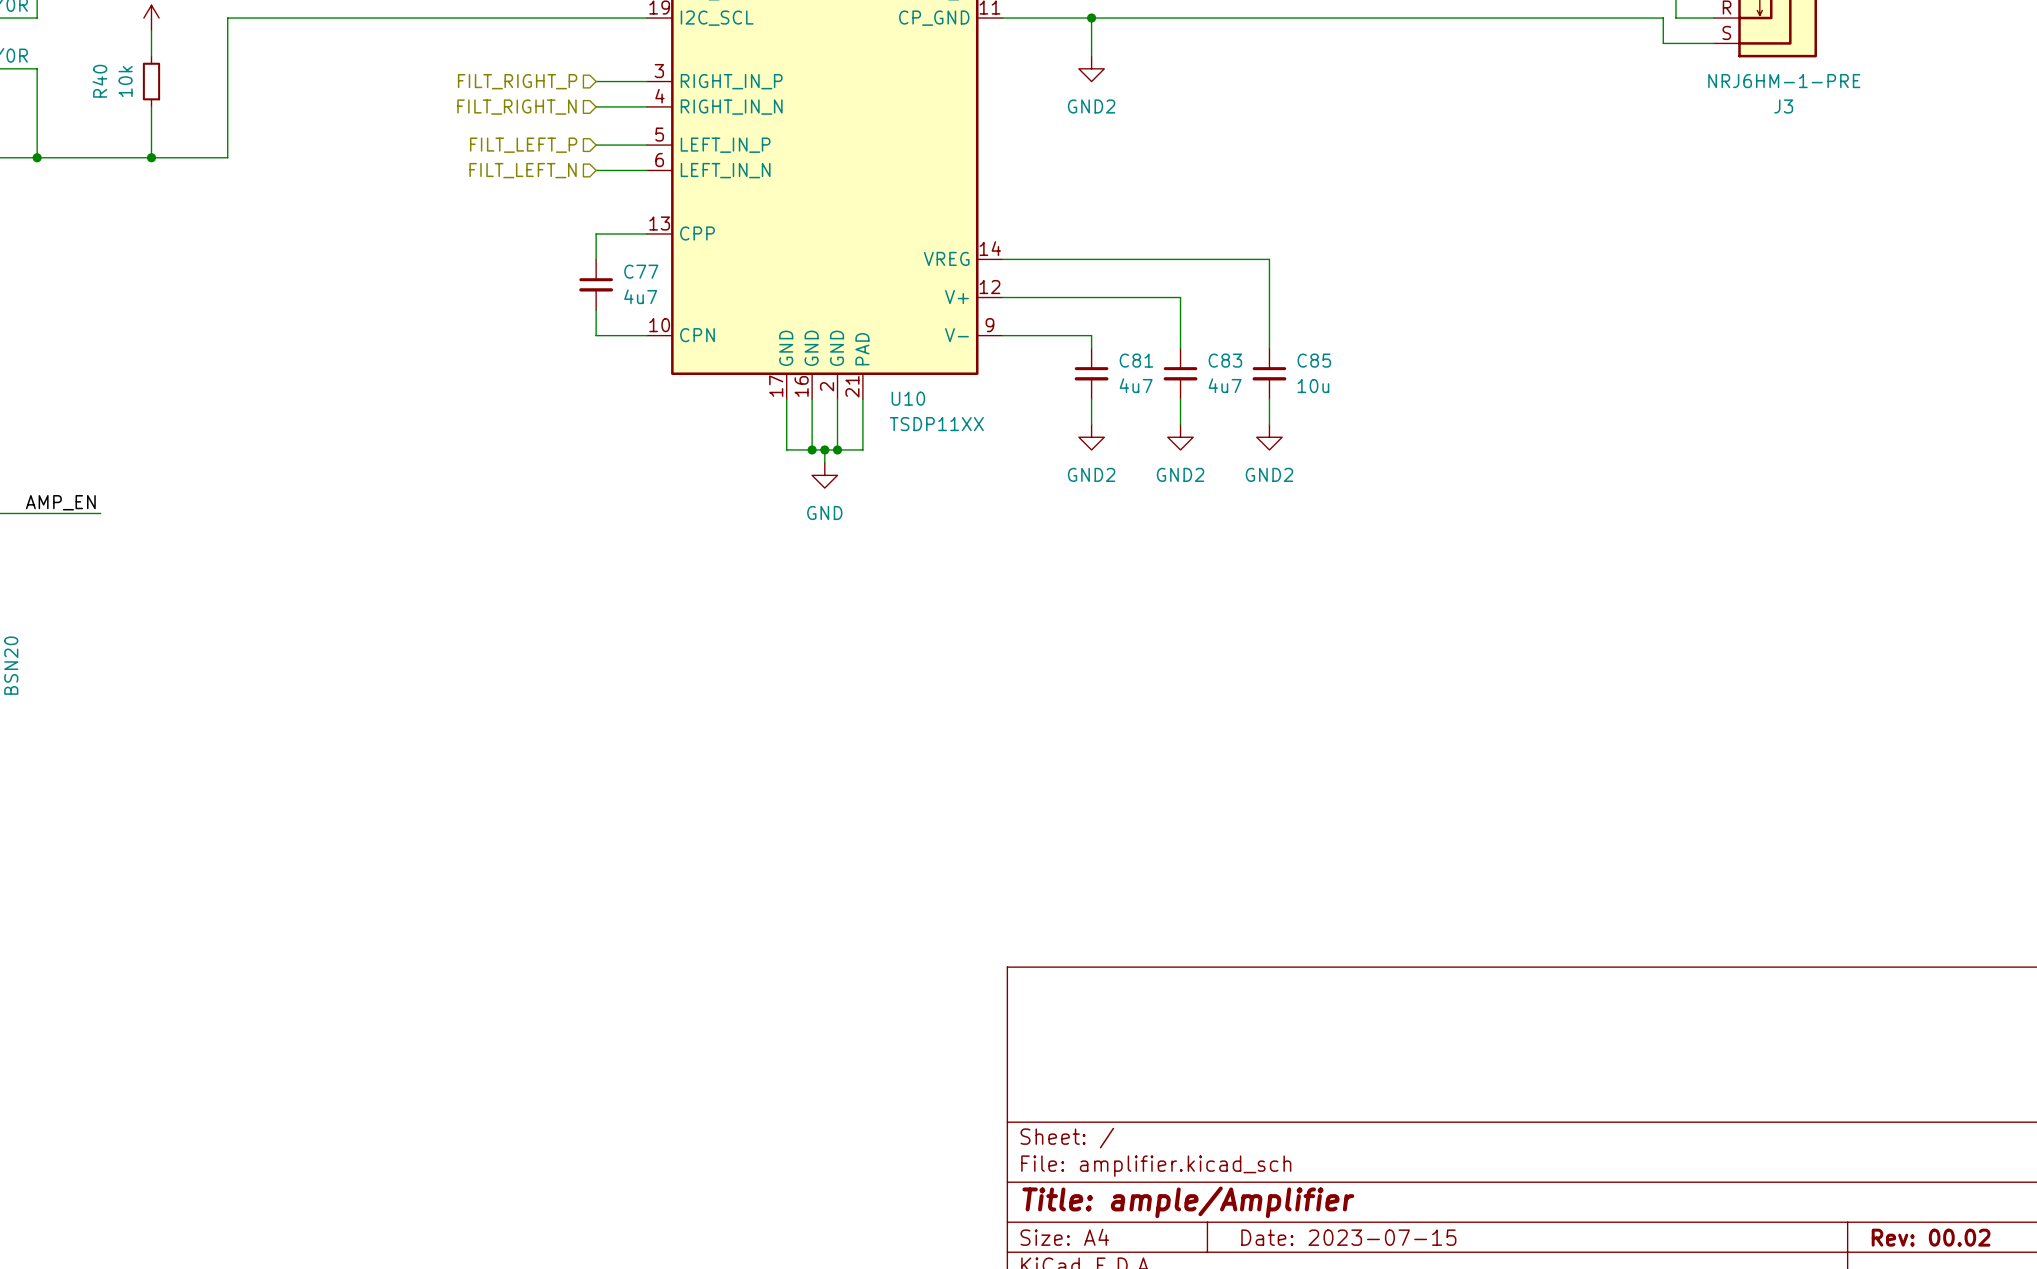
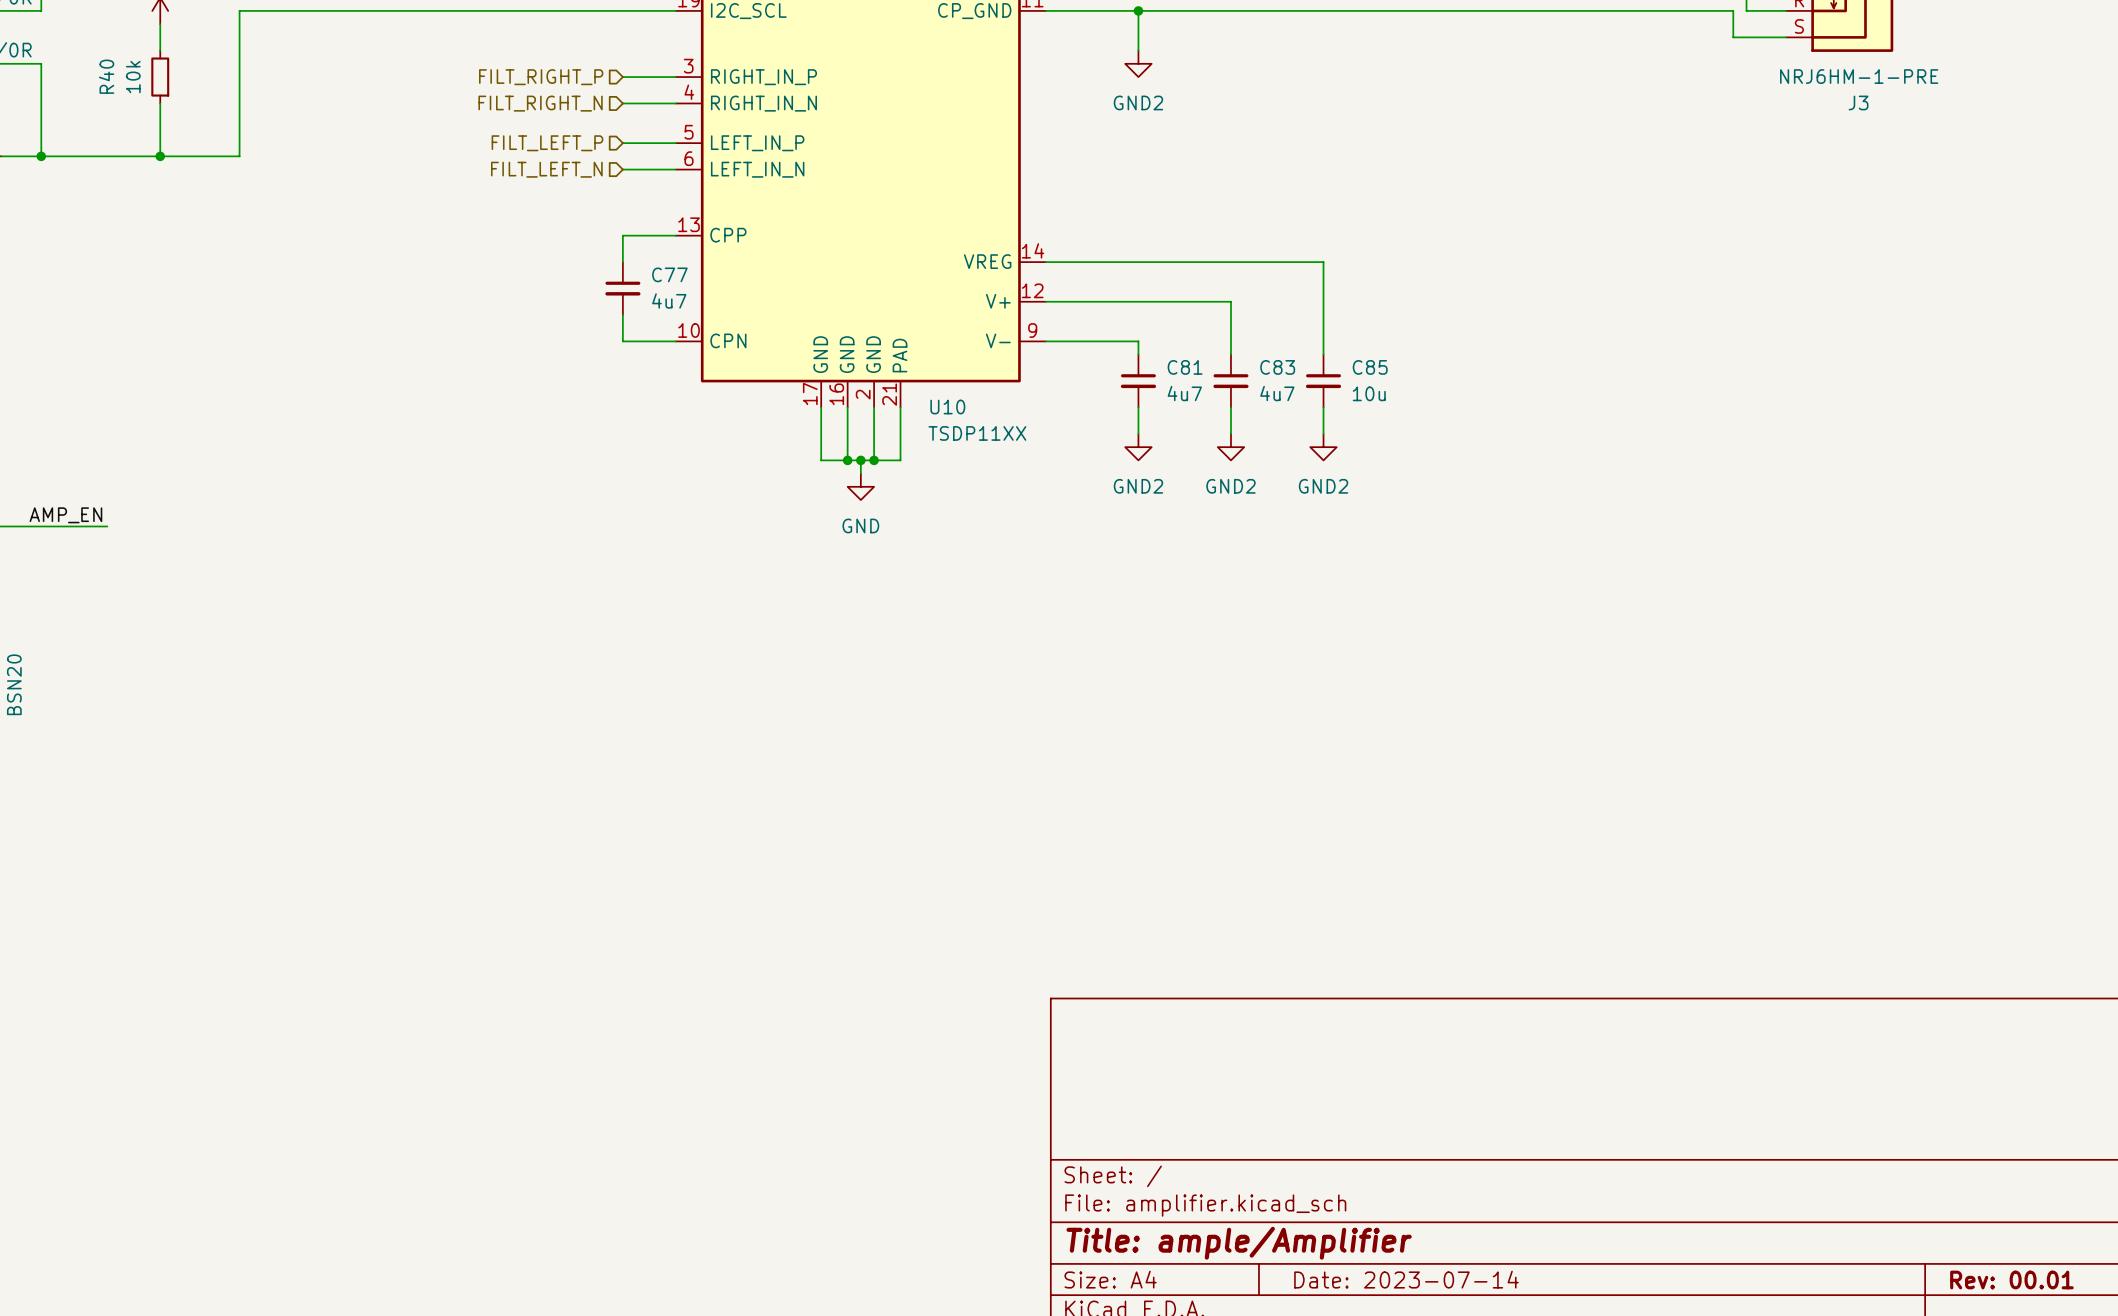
title block: Date: 2023-07-15 (1348, 1237) -> Date: 2023-07-14 (1406, 1279)
title block: Rev: 00.02 (1931, 1237) -> Rev: 00.01 (2011, 1279)

